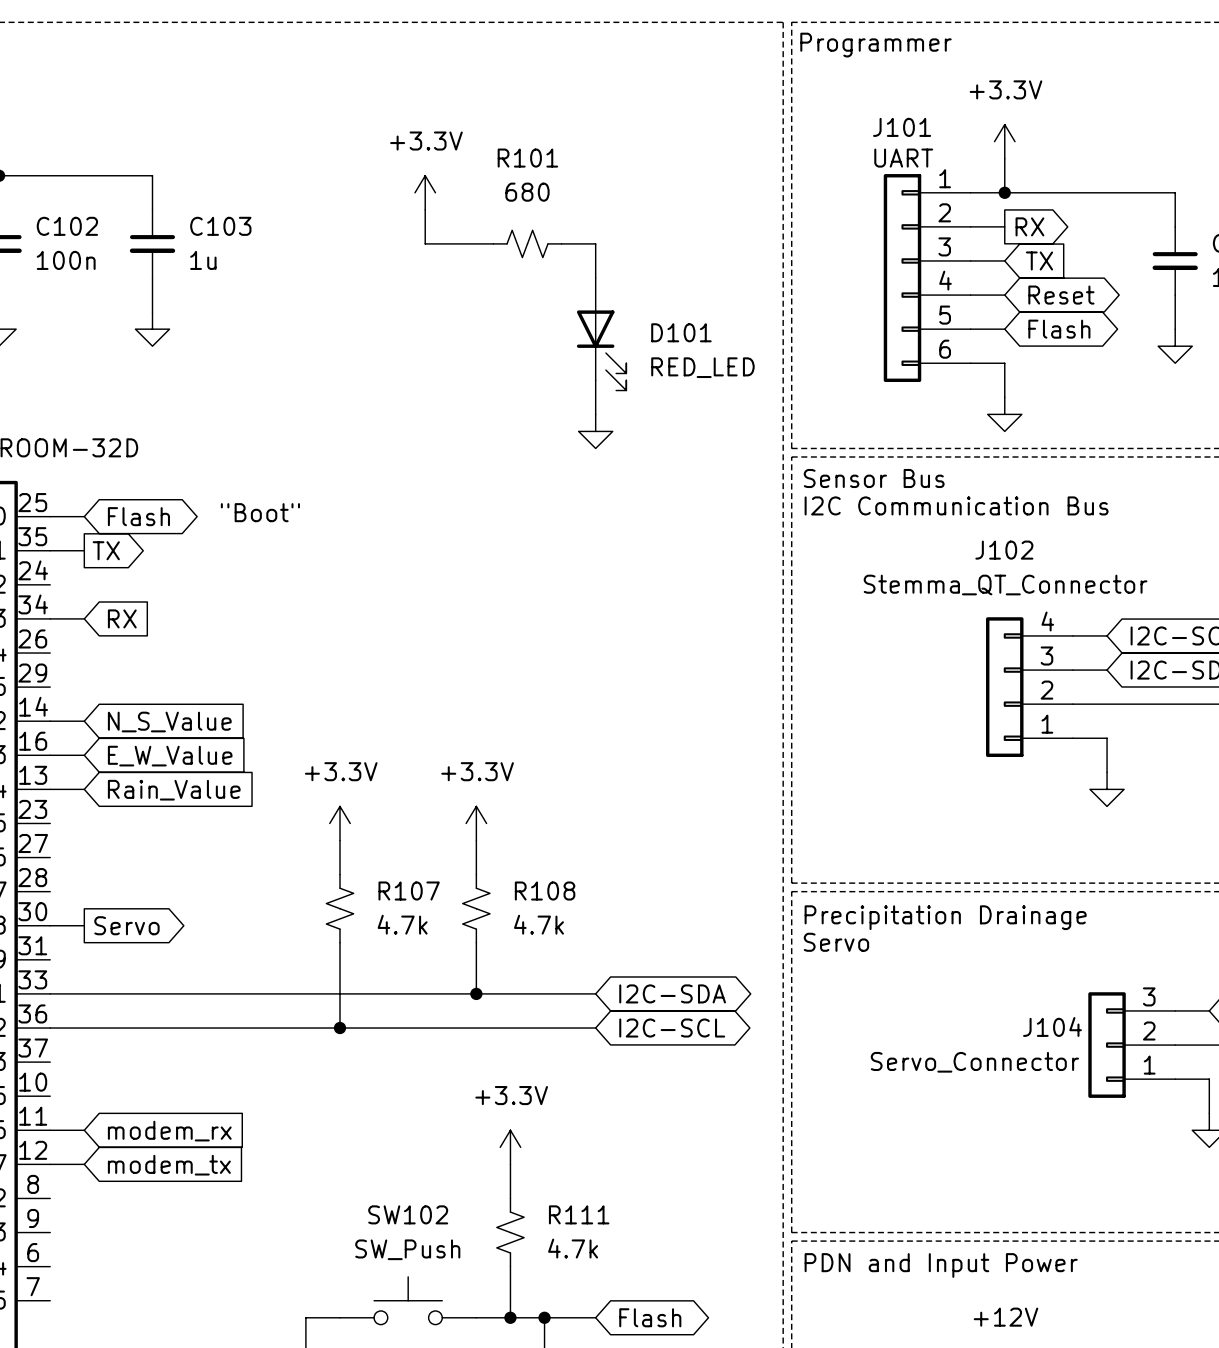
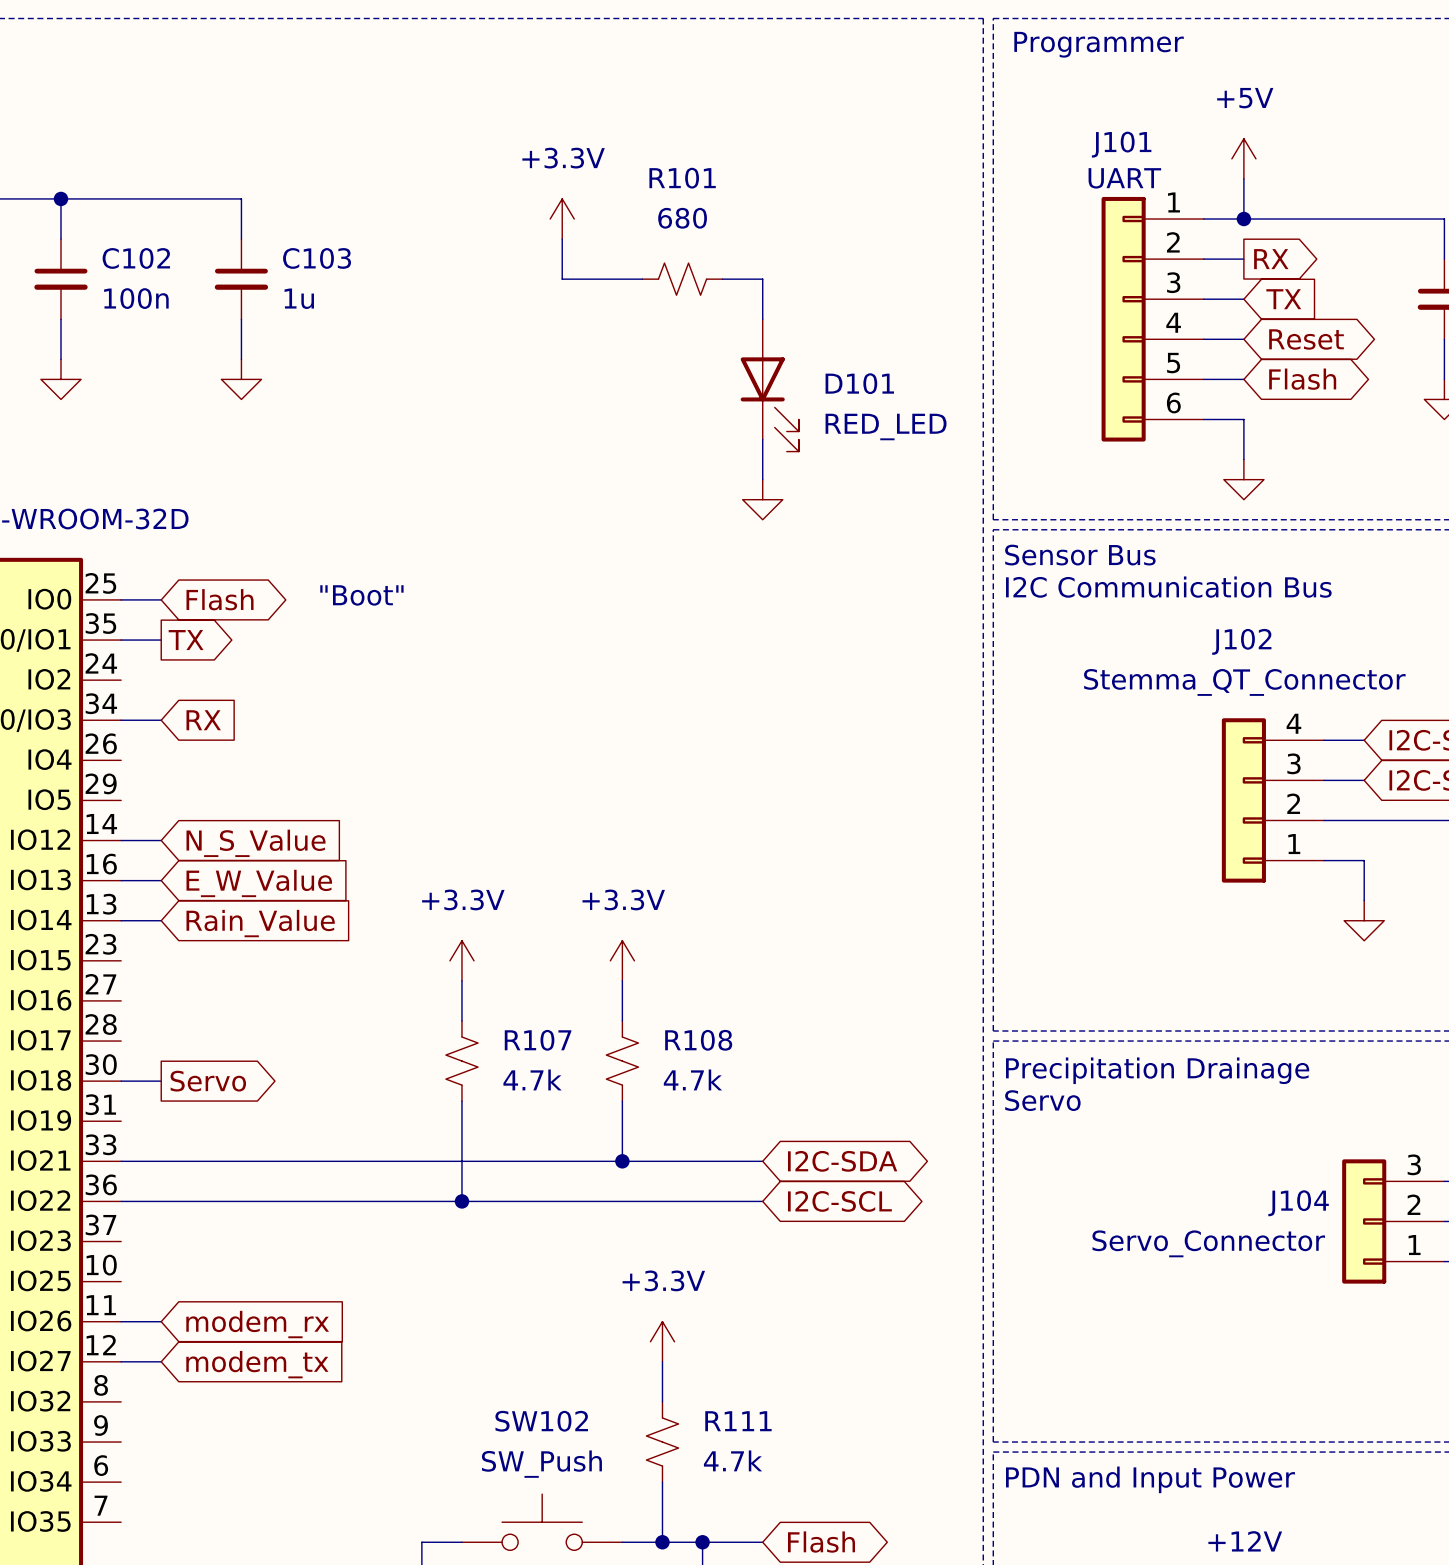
power symbol: +3.3V (1004, 141) -> +5V (1243, 158)

